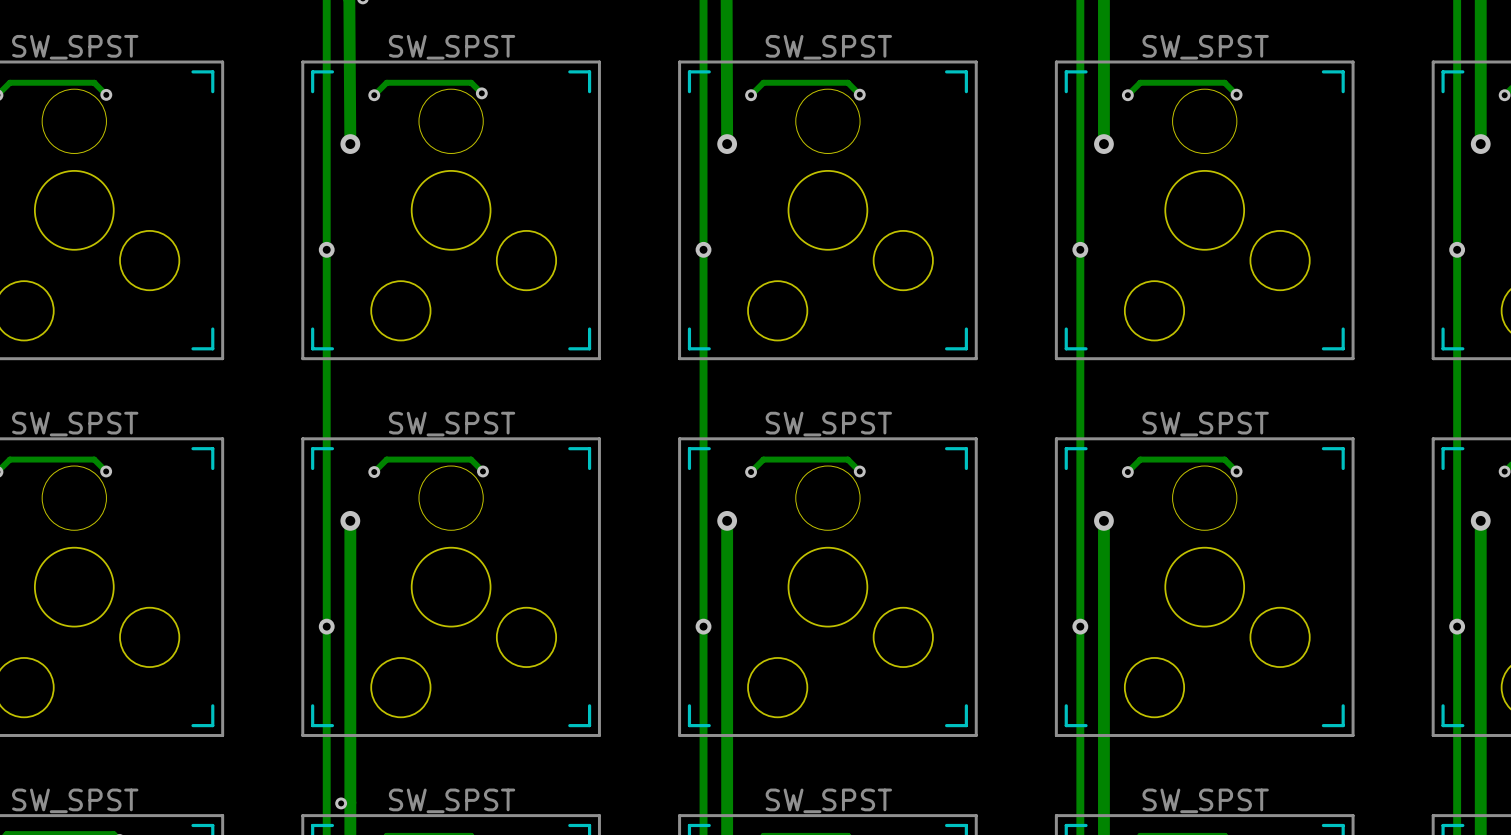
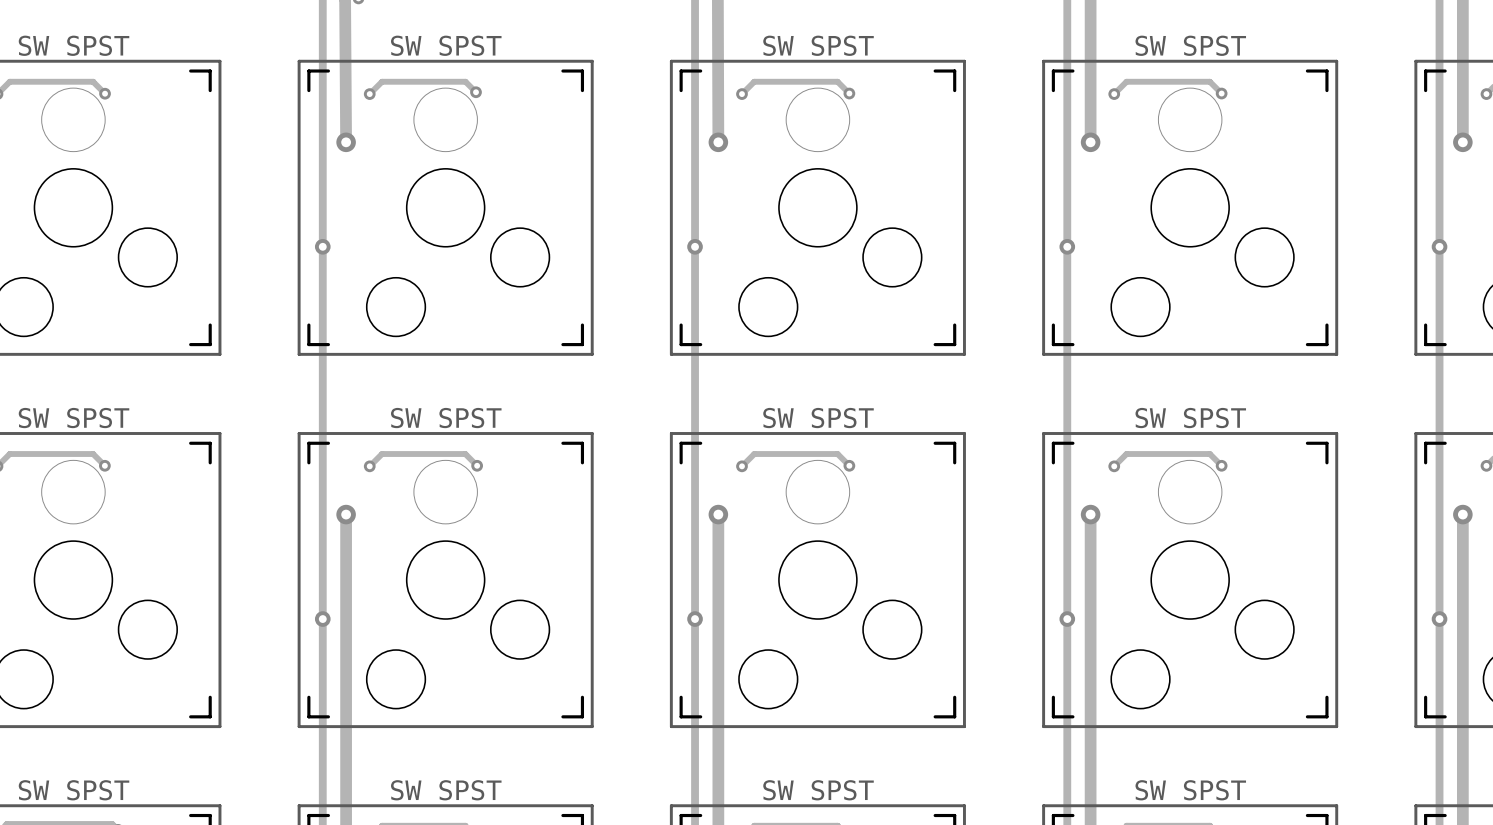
via: (341, 803) -> none

